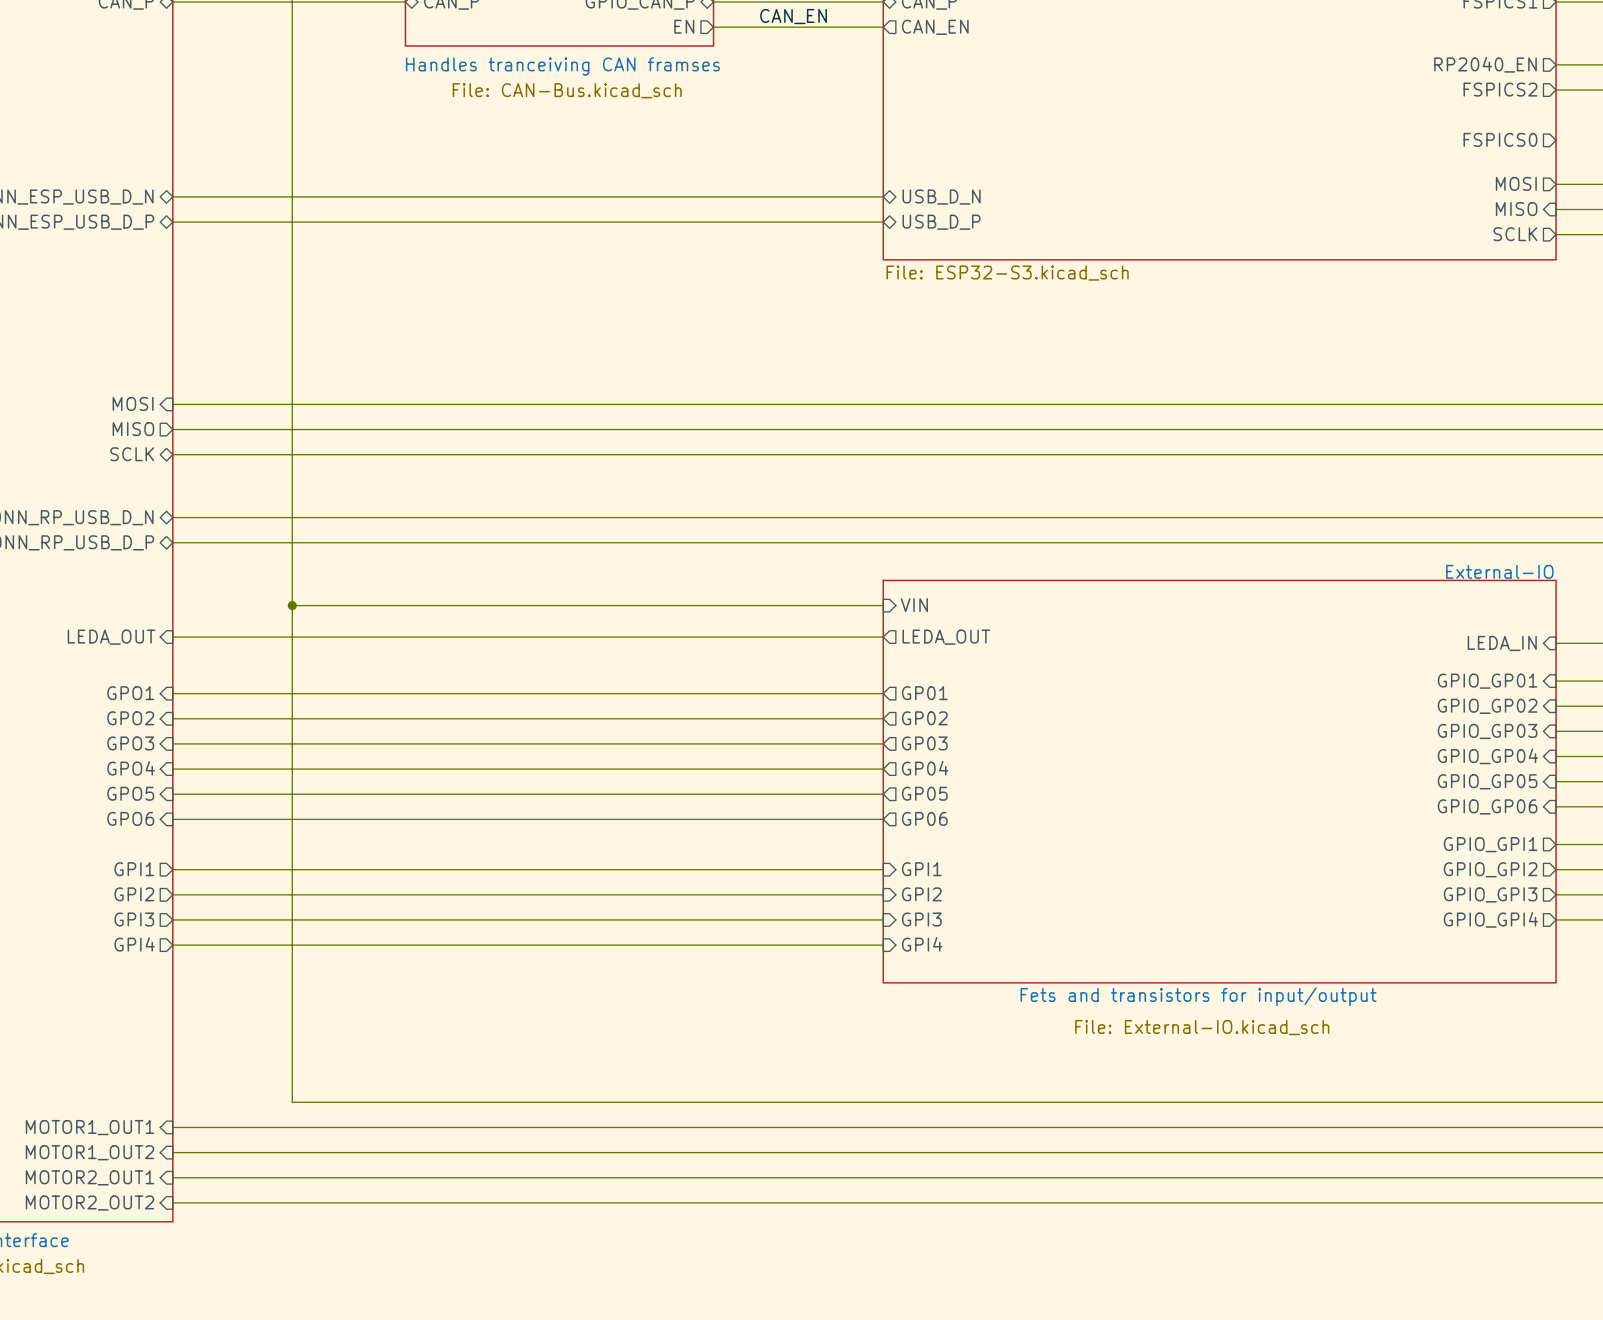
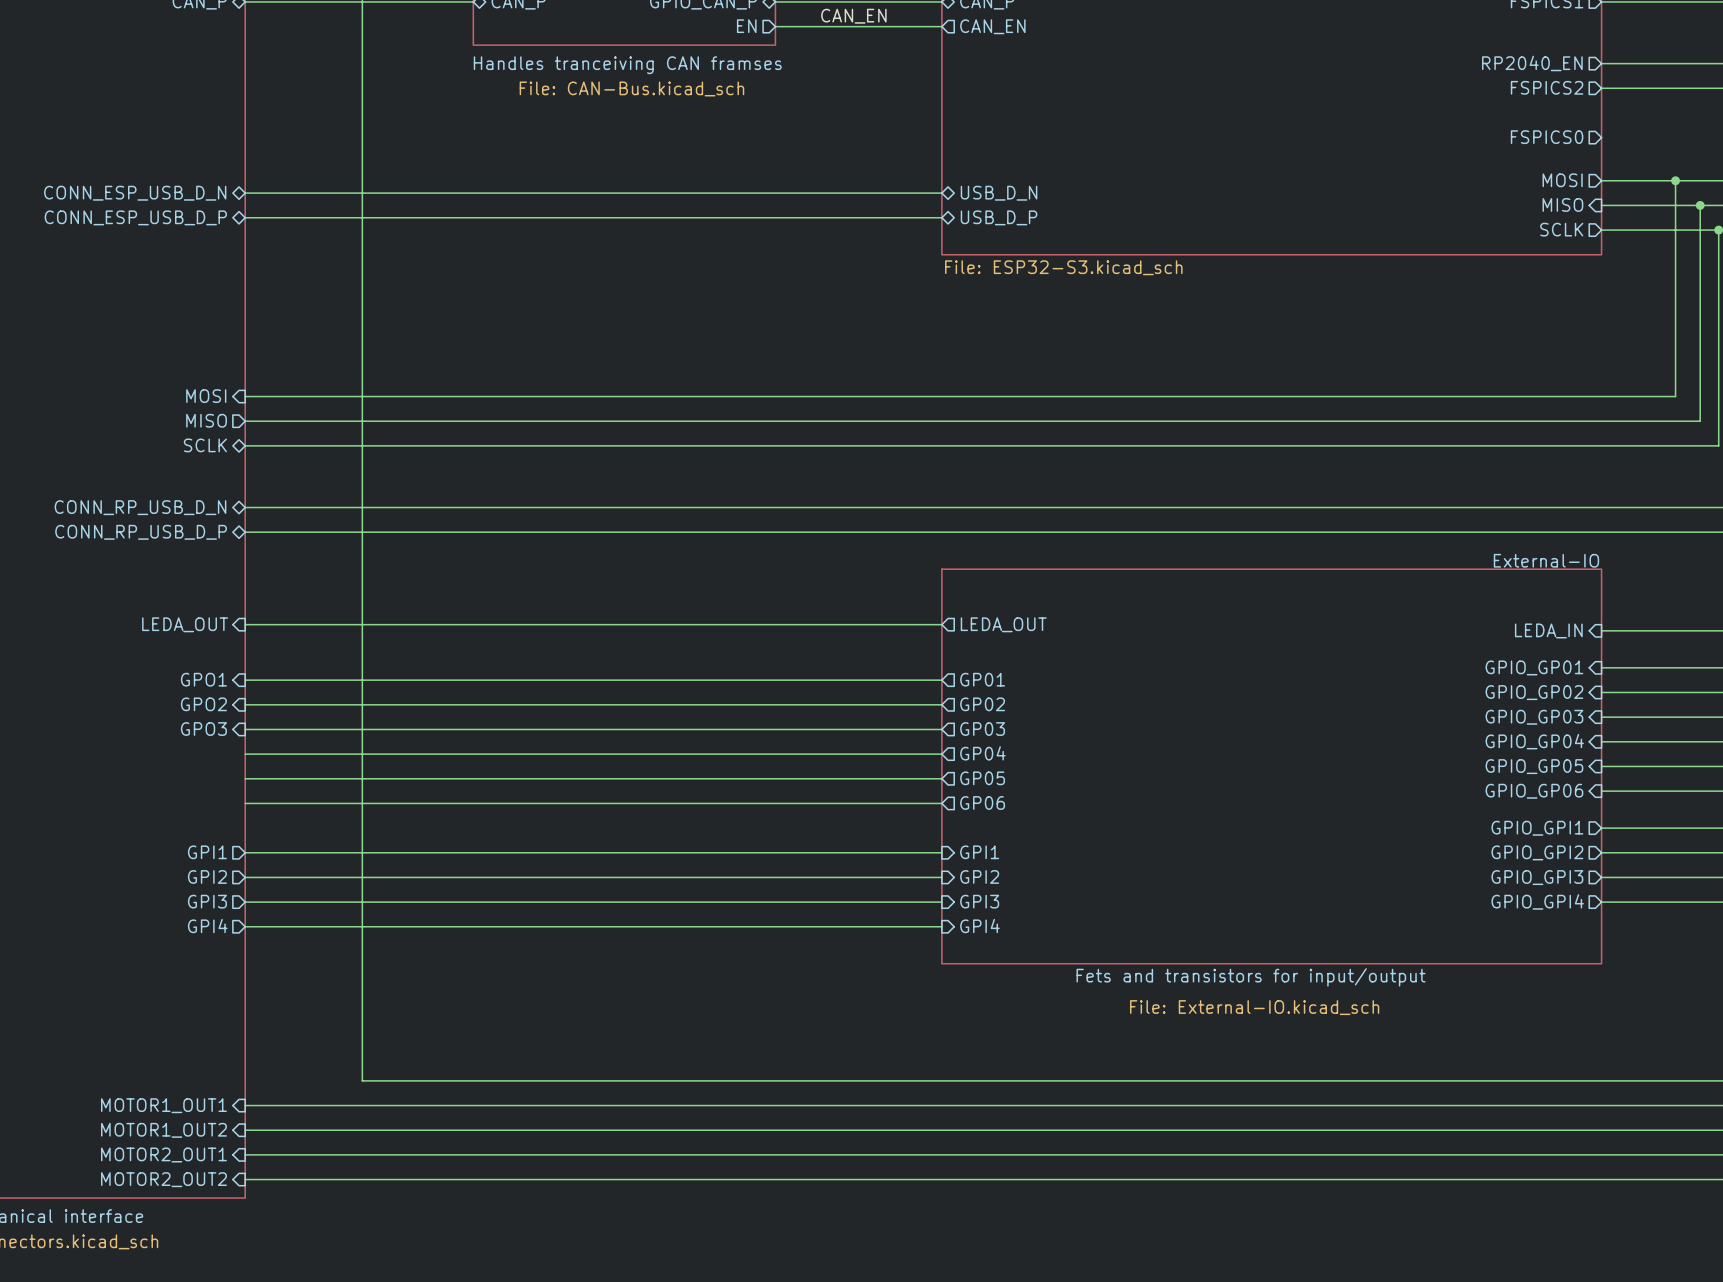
wire: (292, 605) (883, 605) -> none
junction: (292, 605) -> none
sheet pin: VIN (914, 605) -> none
sheet pin: GPO4 (131, 768) -> none
sheet pin: GPO5 (130, 793) -> none
sheet pin: GPO6 (130, 818) -> none

